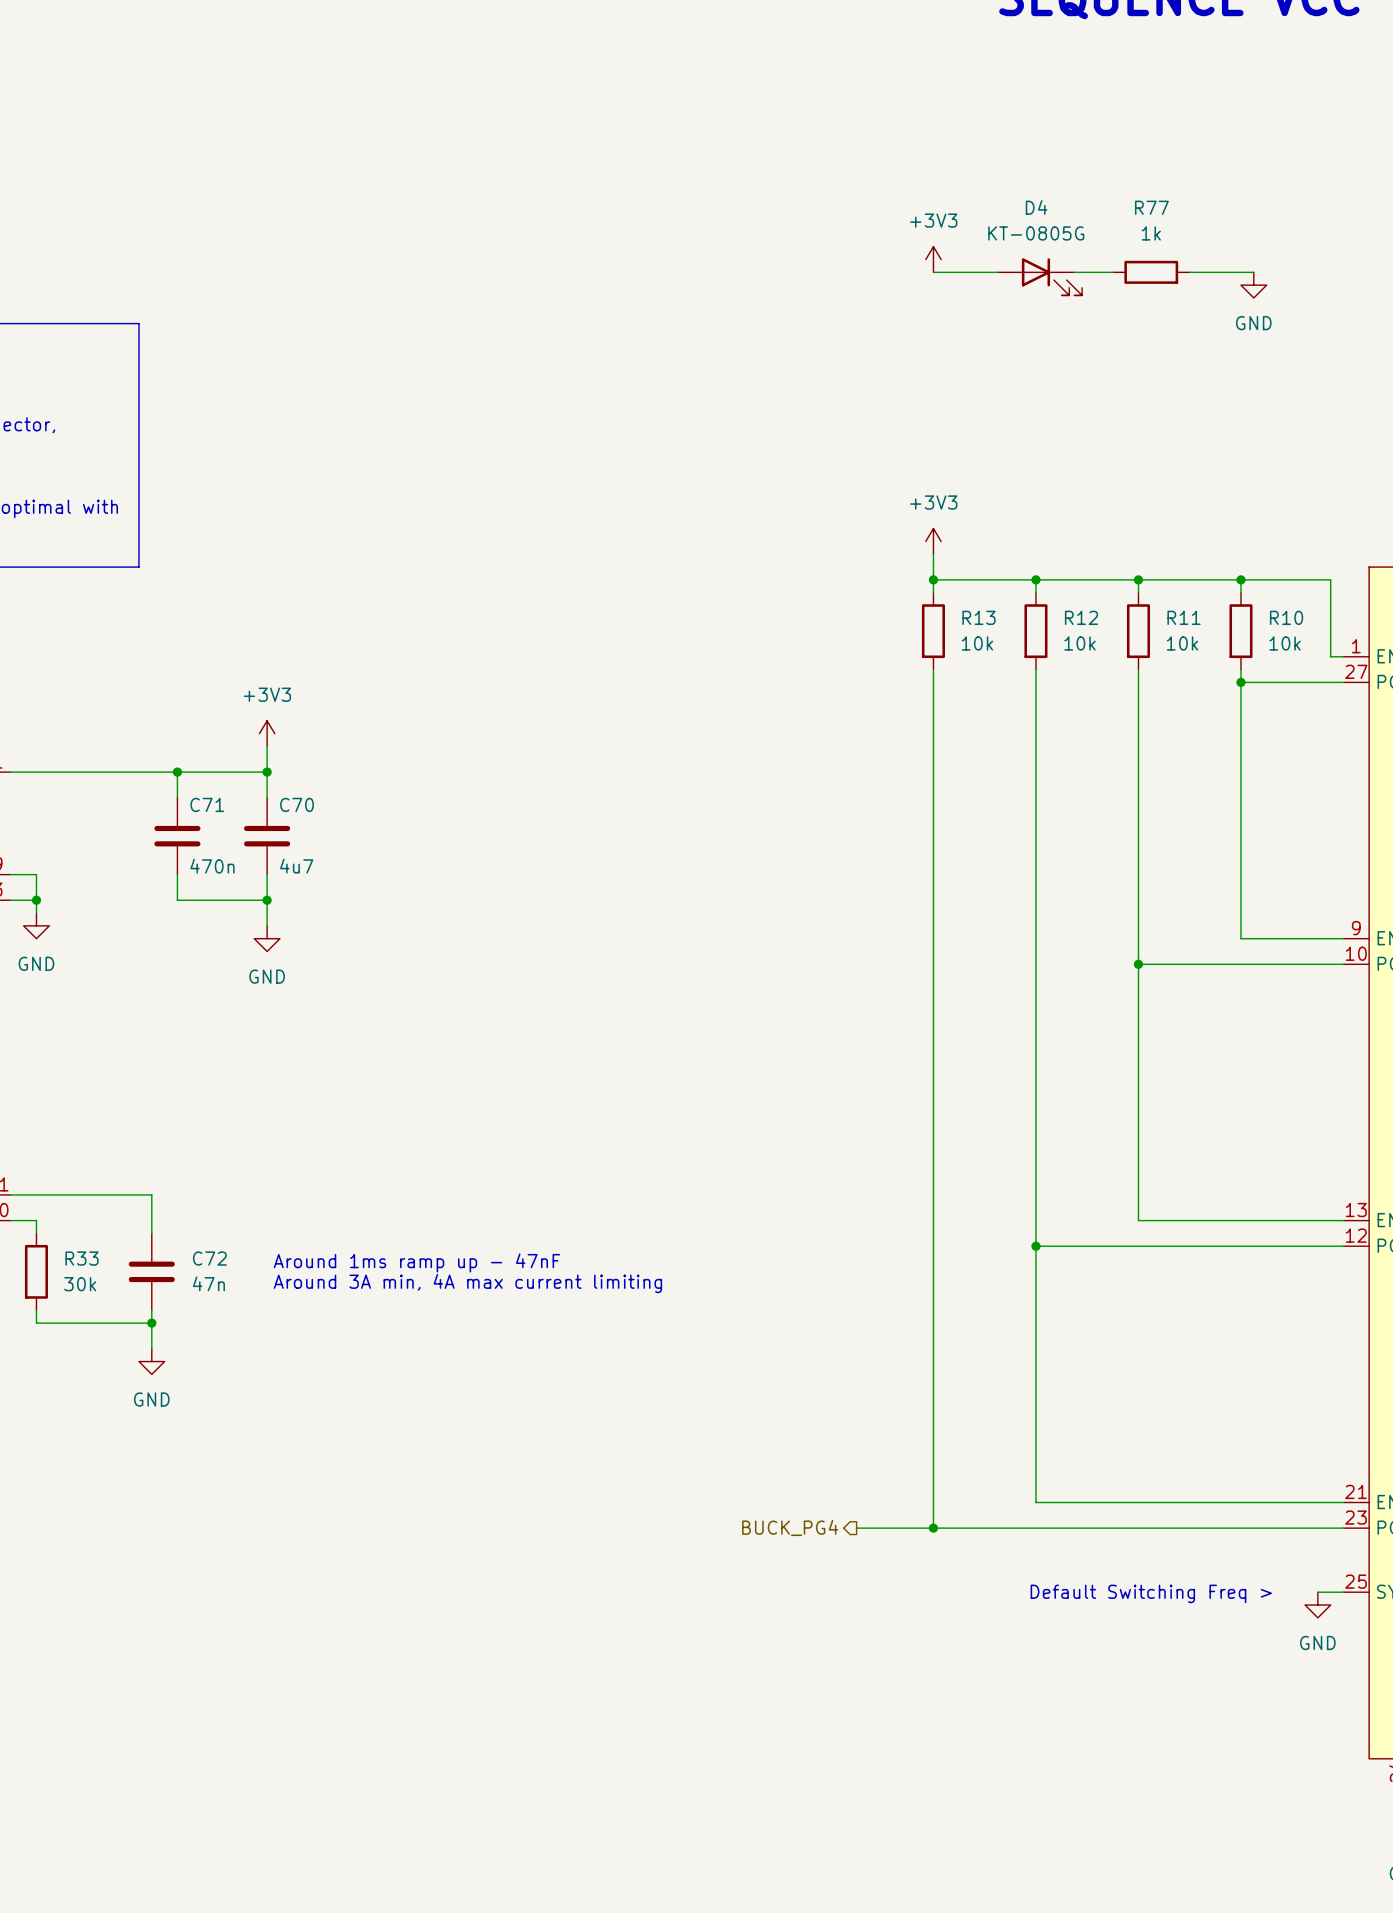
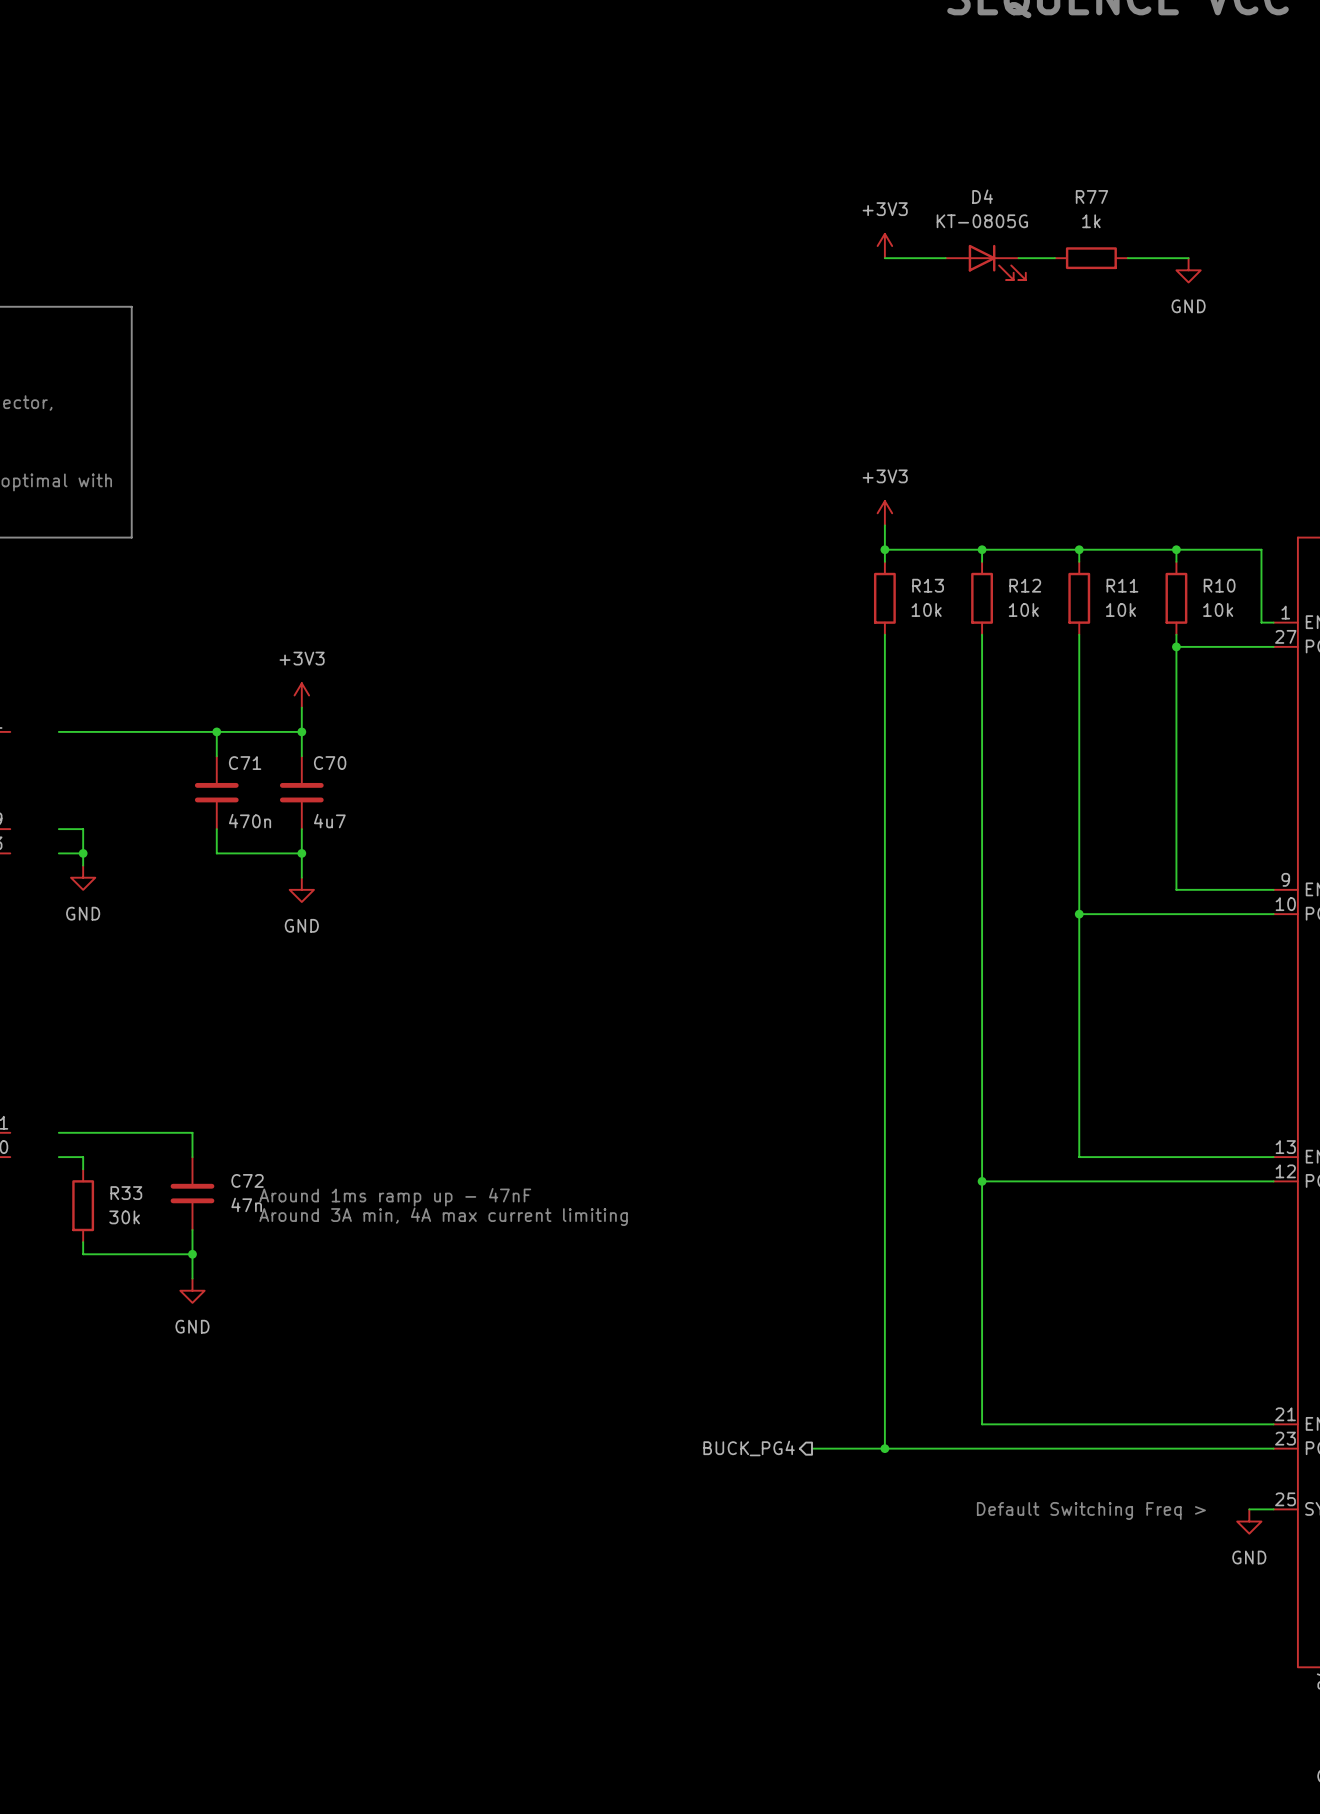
power symbol position: +3V3 (267, 733) -> +3V3 (301, 695)
wire: (267, 746) (267, 797) -> (301, 707) (301, 756)
wire: (10, 772) (62, 772) -> none
wire: (177, 772) (177, 797) -> (216, 731) (216, 756)
junction: (177, 772) -> none
junction: none -> (216, 731)
wire: none -> (253, 731) (301, 731)
junction: (267, 772) -> none
junction: none -> (301, 731)
C71 position: (177, 836) -> (216, 792)
C70 position: (267, 836) -> (301, 792)
wire: (10, 874) (36, 874) (36, 913) -> (58, 829) (83, 829) (83, 865)
wire: (177, 874) (177, 900) (228, 900) -> (216, 829) (216, 853)
wire: (267, 874) (267, 925) -> (301, 829) (301, 877)
wire: (10, 900) (36, 900) -> (58, 853) (83, 853)
junction position: (36, 900) -> (83, 853)
wire: none -> (253, 853) (301, 853)
junction position: (267, 900) -> (301, 853)
power symbol position: GND (36, 925) -> GND (83, 877)
power symbol position: GND (267, 938) -> GND (301, 889)
wire: (10, 1194) (62, 1194) -> (143, 1254) (192, 1254)
wire: (151, 1194) (151, 1233) -> (143, 1132) (192, 1132) (192, 1157)
wire: (10, 1220) (36, 1220) (36, 1233) -> (58, 1157) (83, 1157) (83, 1169)
R33 position: (36, 1271) -> (83, 1205)
C72 position: (151, 1271) -> (192, 1193)
wire: none -> (192, 1229) (192, 1278)
wire: (36, 1310) (36, 1323) (87, 1323) -> (83, 1242) (83, 1254)
wire: (151, 1310) (151, 1348) -> none
junction position: (151, 1323) -> (192, 1254)
power symbol position: GND (151, 1361) -> GND (192, 1290)

